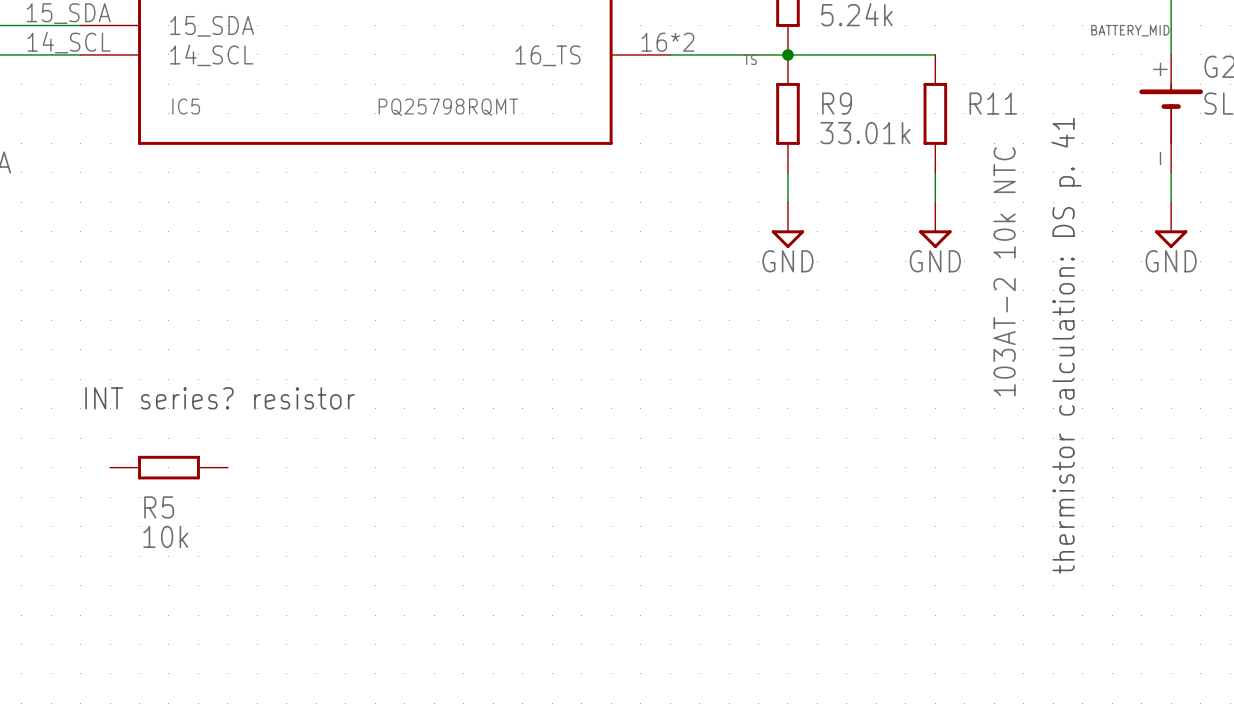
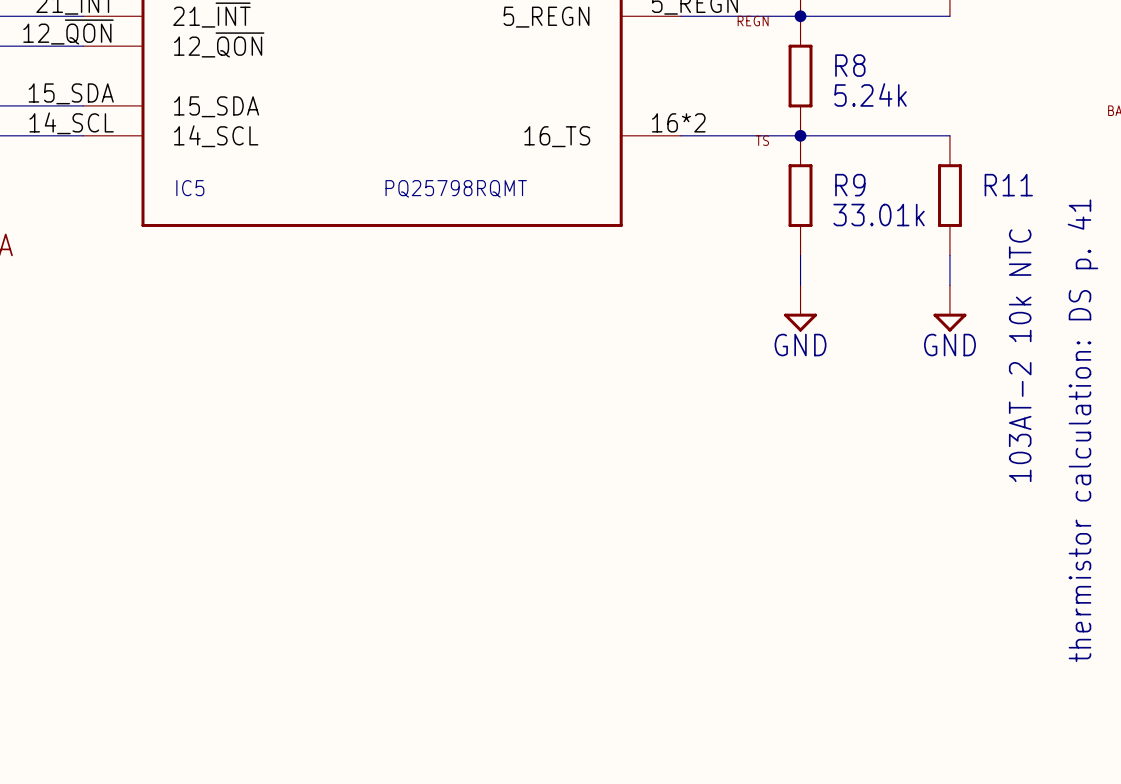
text: INT series? resistor (220, 398) -> none
R5: 10k (168, 467) -> none

